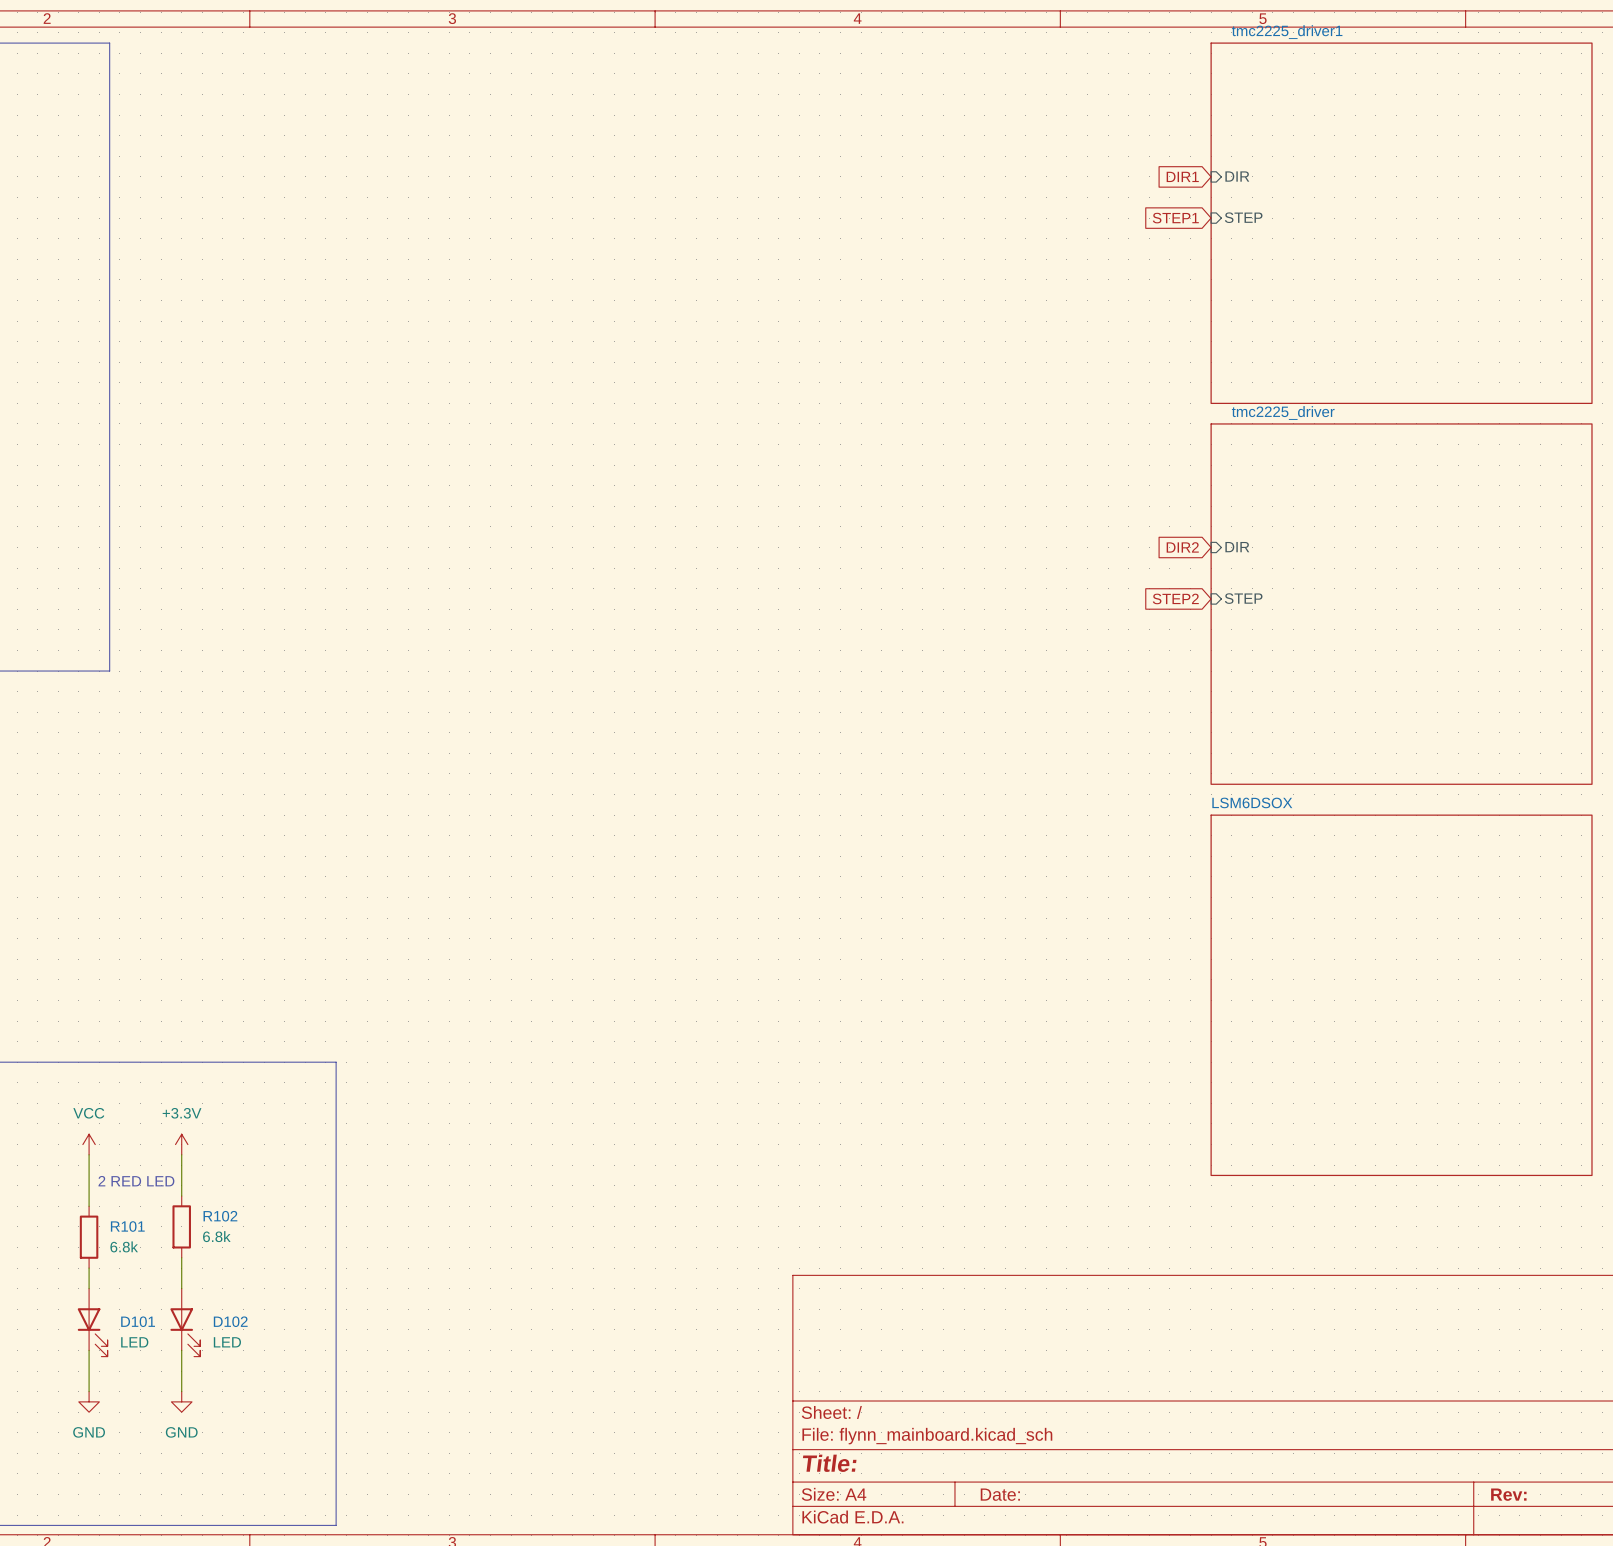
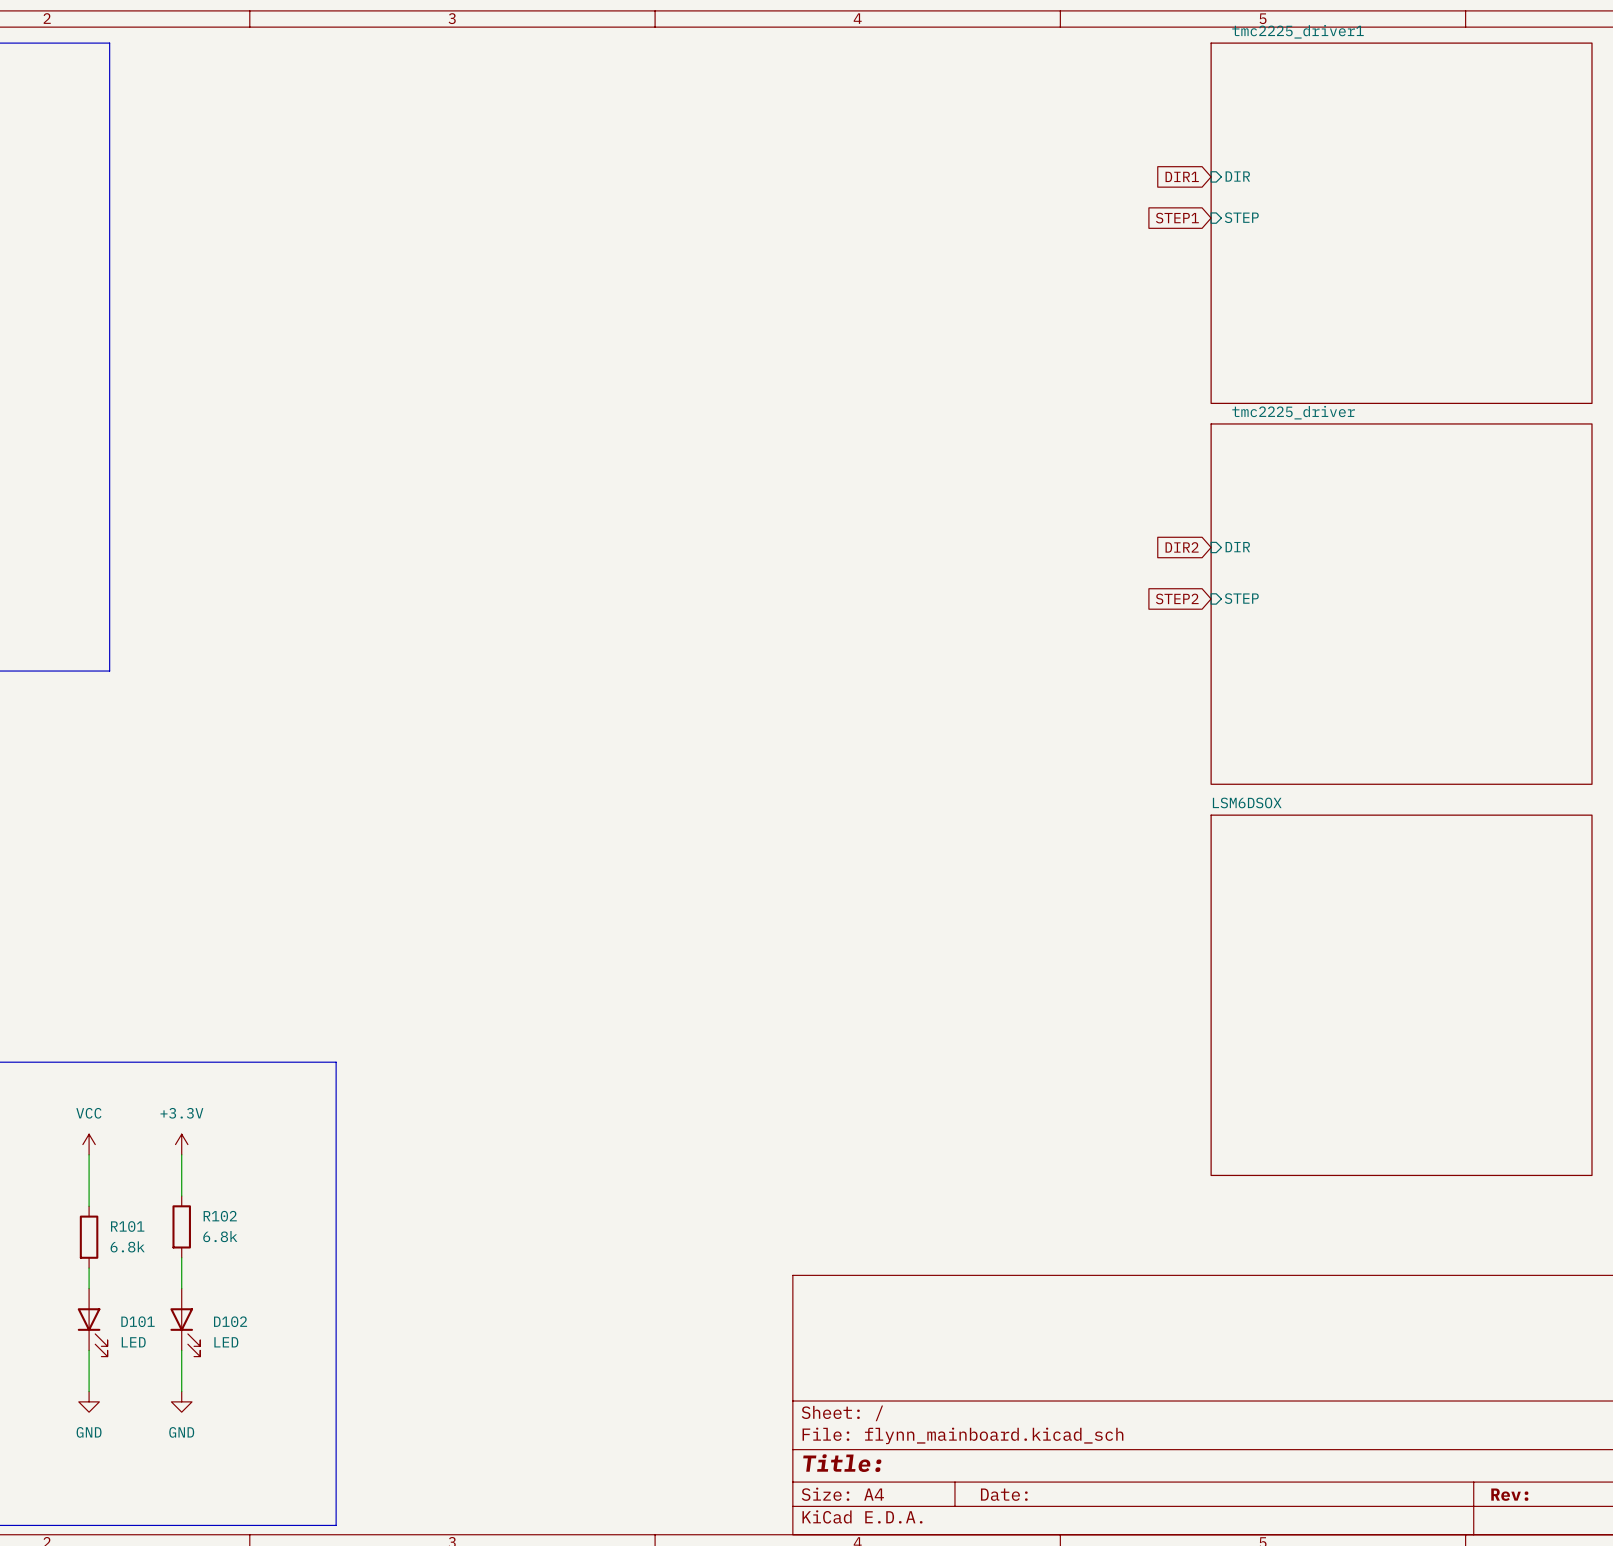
text: 2 RED LED (136, 1181) -> none

